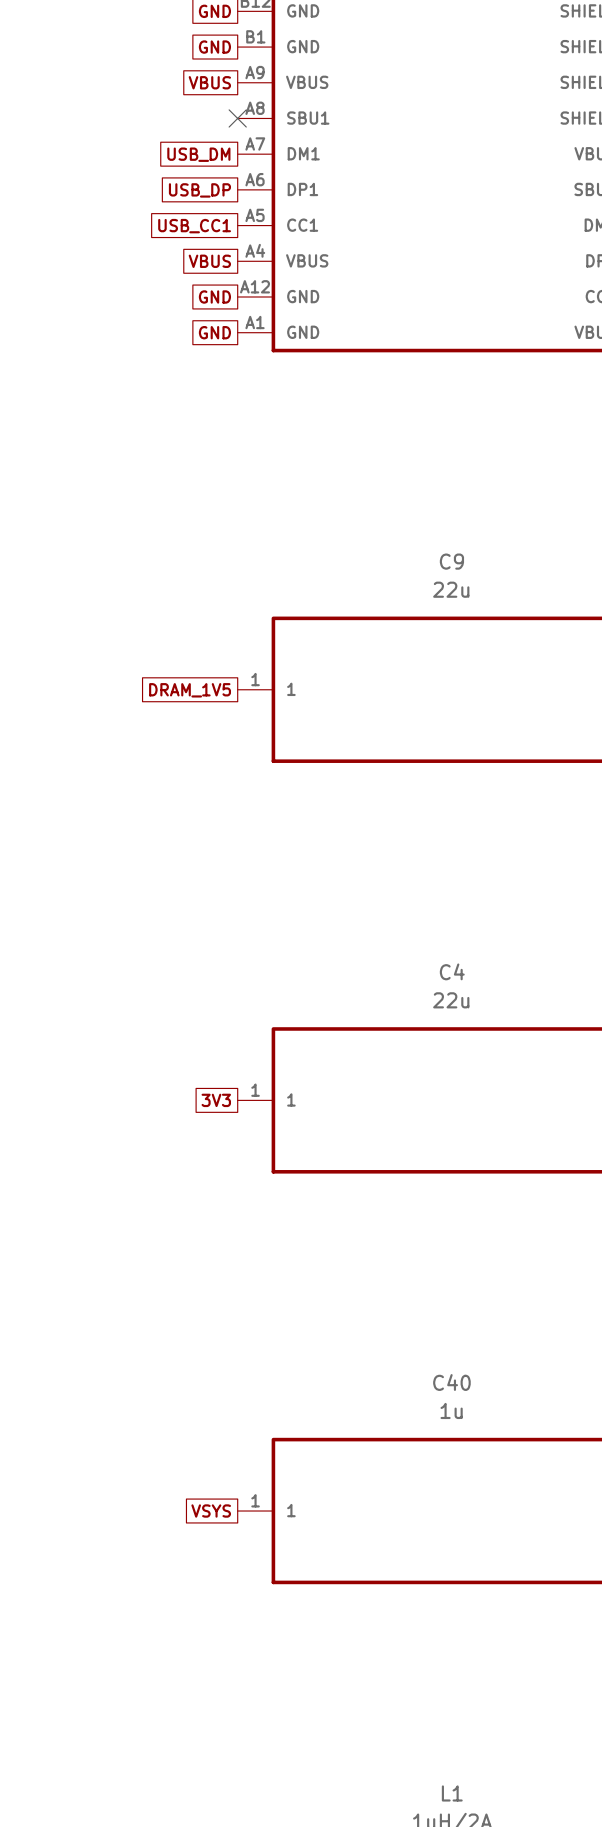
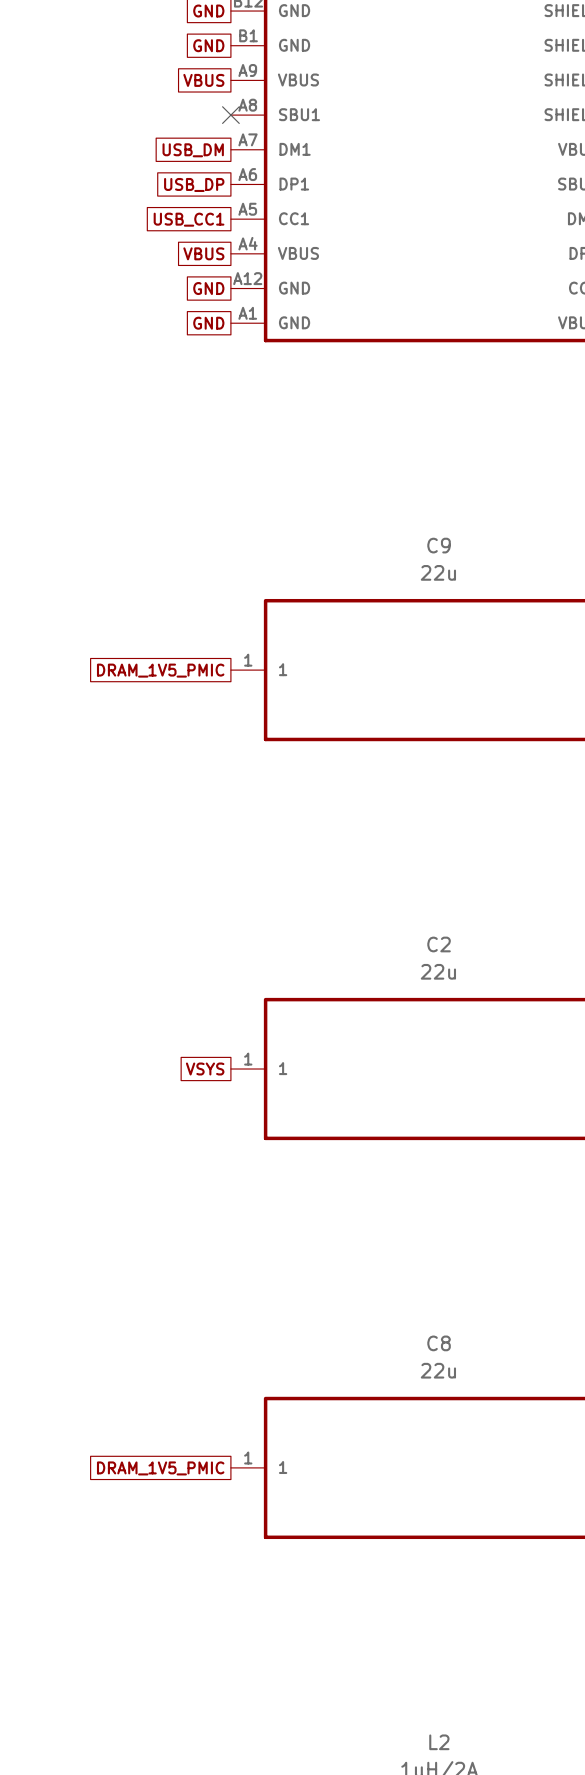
global label: DRAM_1V5 (190, 690) -> DRAM_1V5_PMIC (160, 670)
C4 name: C4 (452, 971) -> C2 (439, 944)
global label: 3V3 (216, 1100) -> VSYS (205, 1069)
C40 name: C40 (451, 1382) -> C8 (439, 1343)
C40 value: 1u (451, 1410) -> 22u (438, 1370)
global label: VSYS (211, 1511) -> DRAM_1V5_PMIC (160, 1468)
L1 name: L1 (452, 1793) -> L2 (439, 1742)

